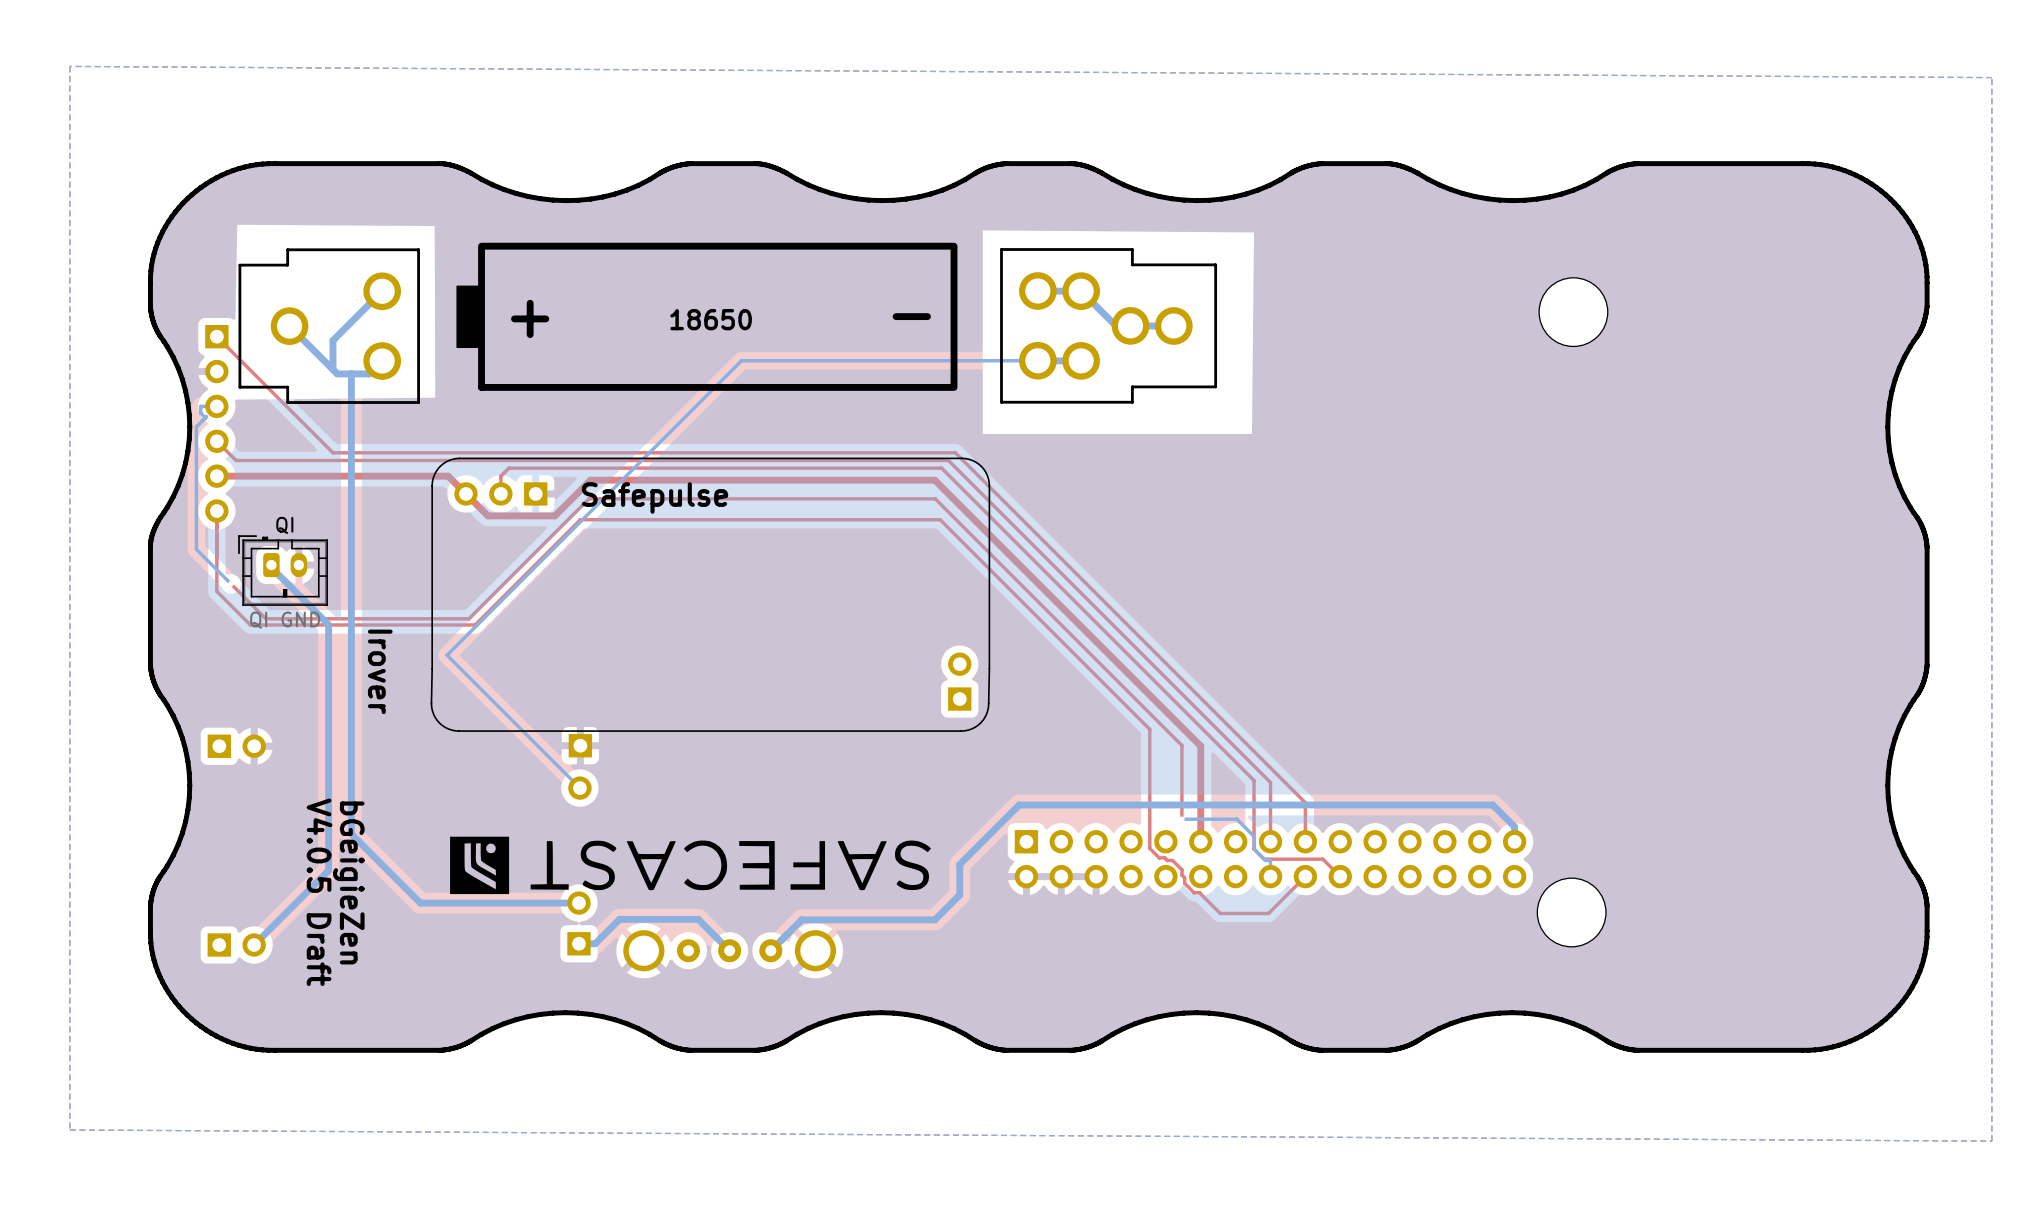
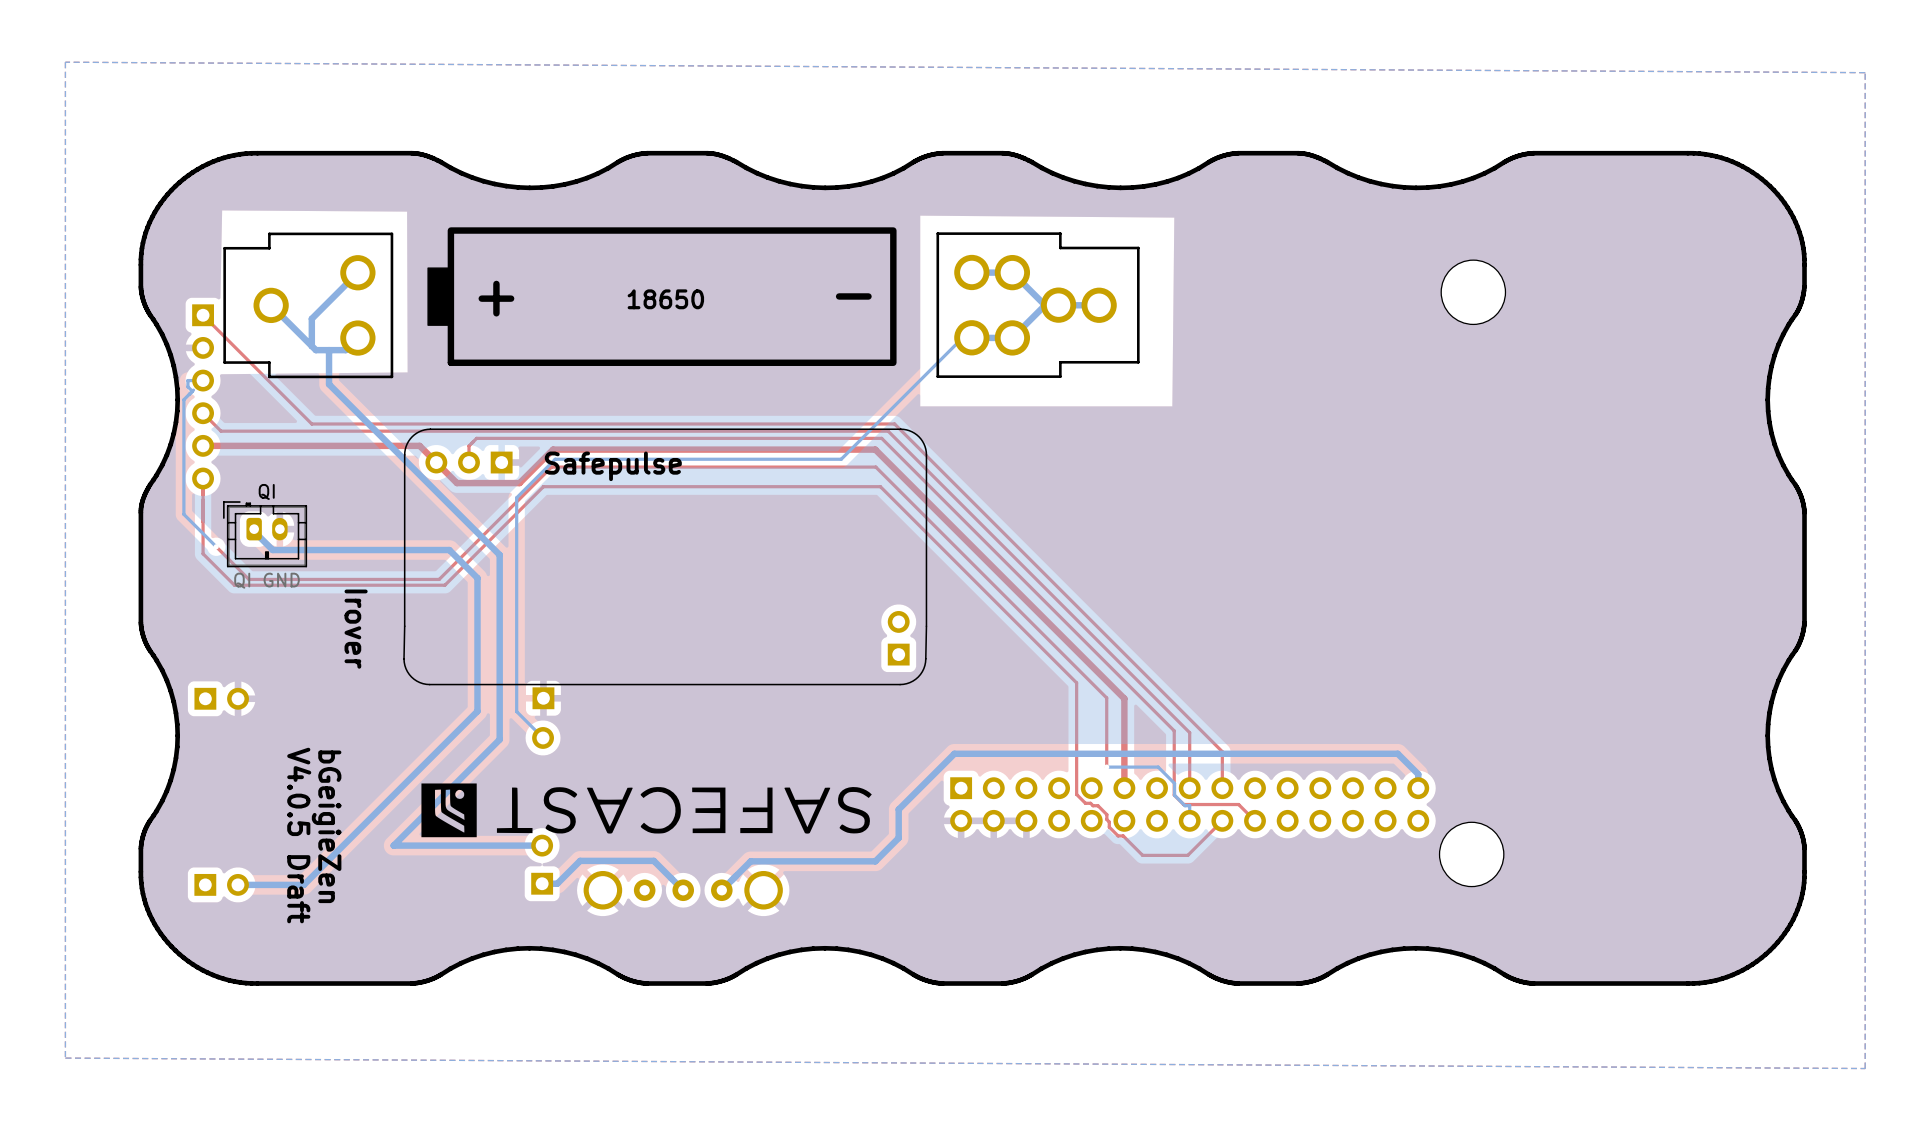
bottom track: none -> (1045, 305) (1012, 337)
bottom track: (1028, 360) (741, 360) (447, 655) (551, 759) -> (962, 337) (841, 459) (555, 459) (516, 497) (516, 711)
bottom track: (351, 410) (351, 834) (420, 903) -> (329, 384) (499, 554) (499, 739) (393, 845)
bottom track: (291, 587) (328, 624) (328, 870) (254, 945) -> (272, 550) (449, 550) (477, 578) (477, 711) (303, 884) (237, 884)

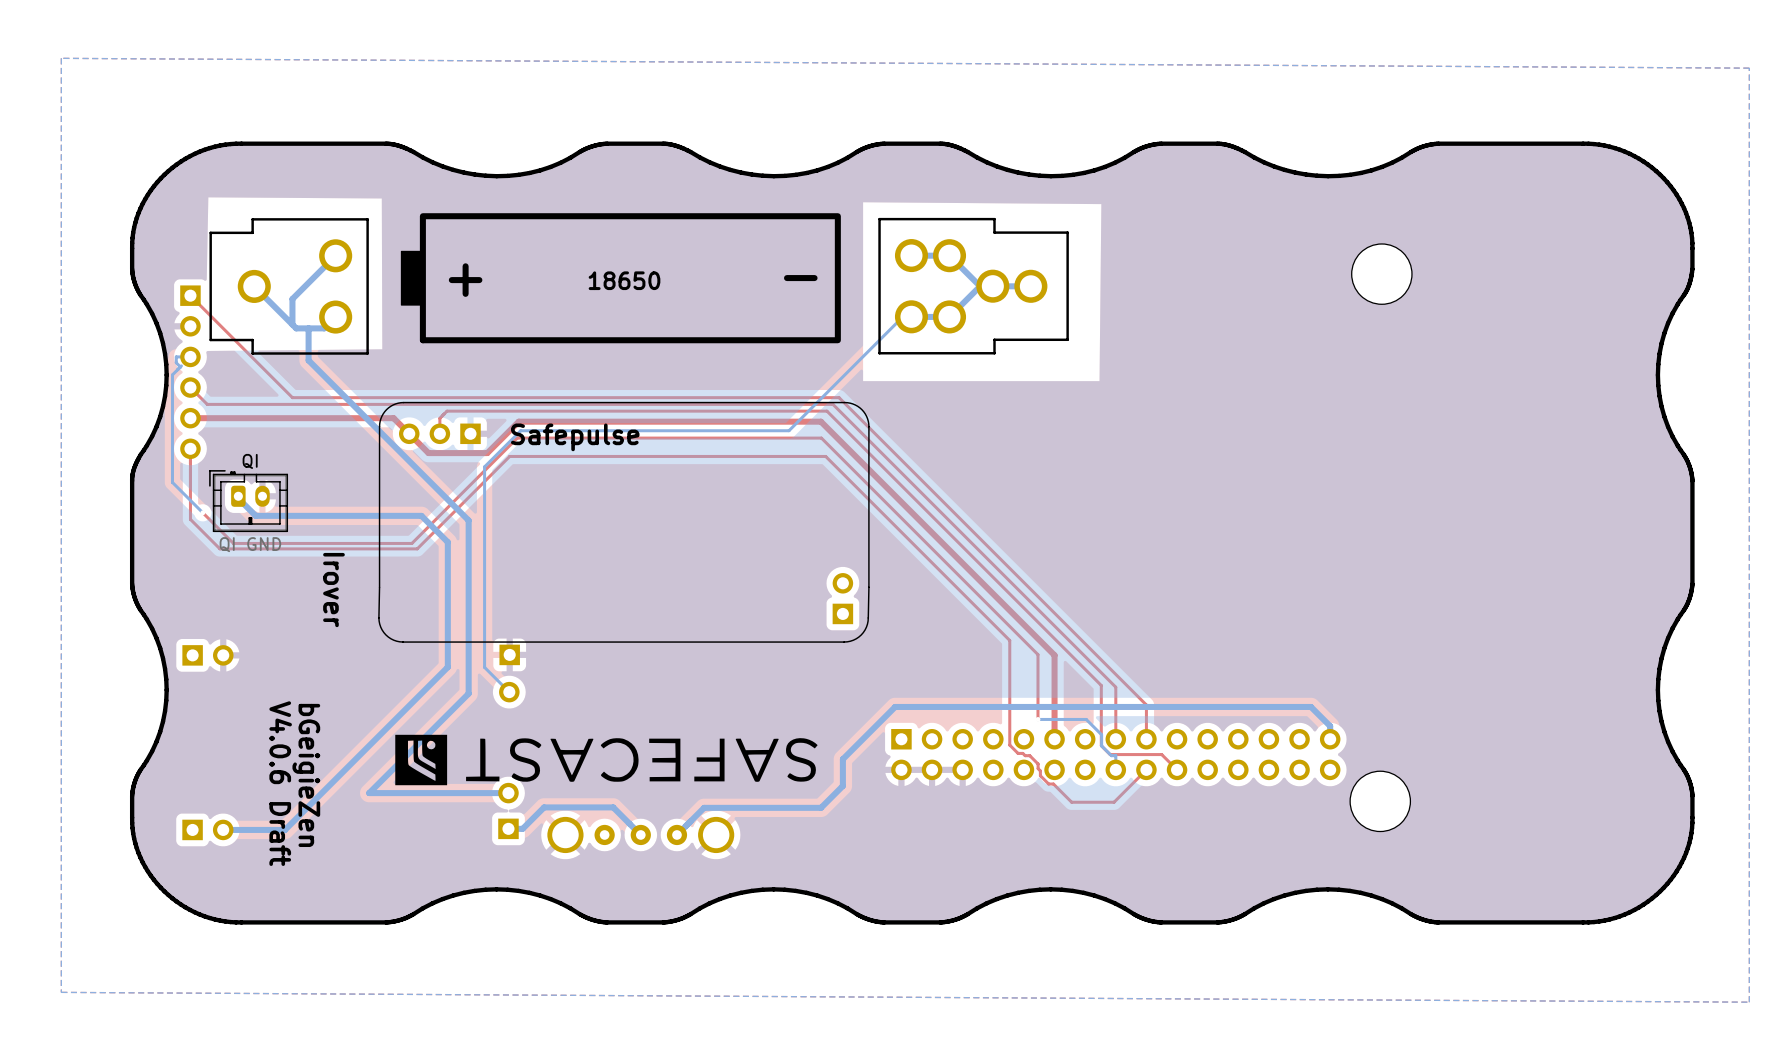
text: V4.0.5 Draft (299, 835) -> V4.0.6 Draft (280, 783)

